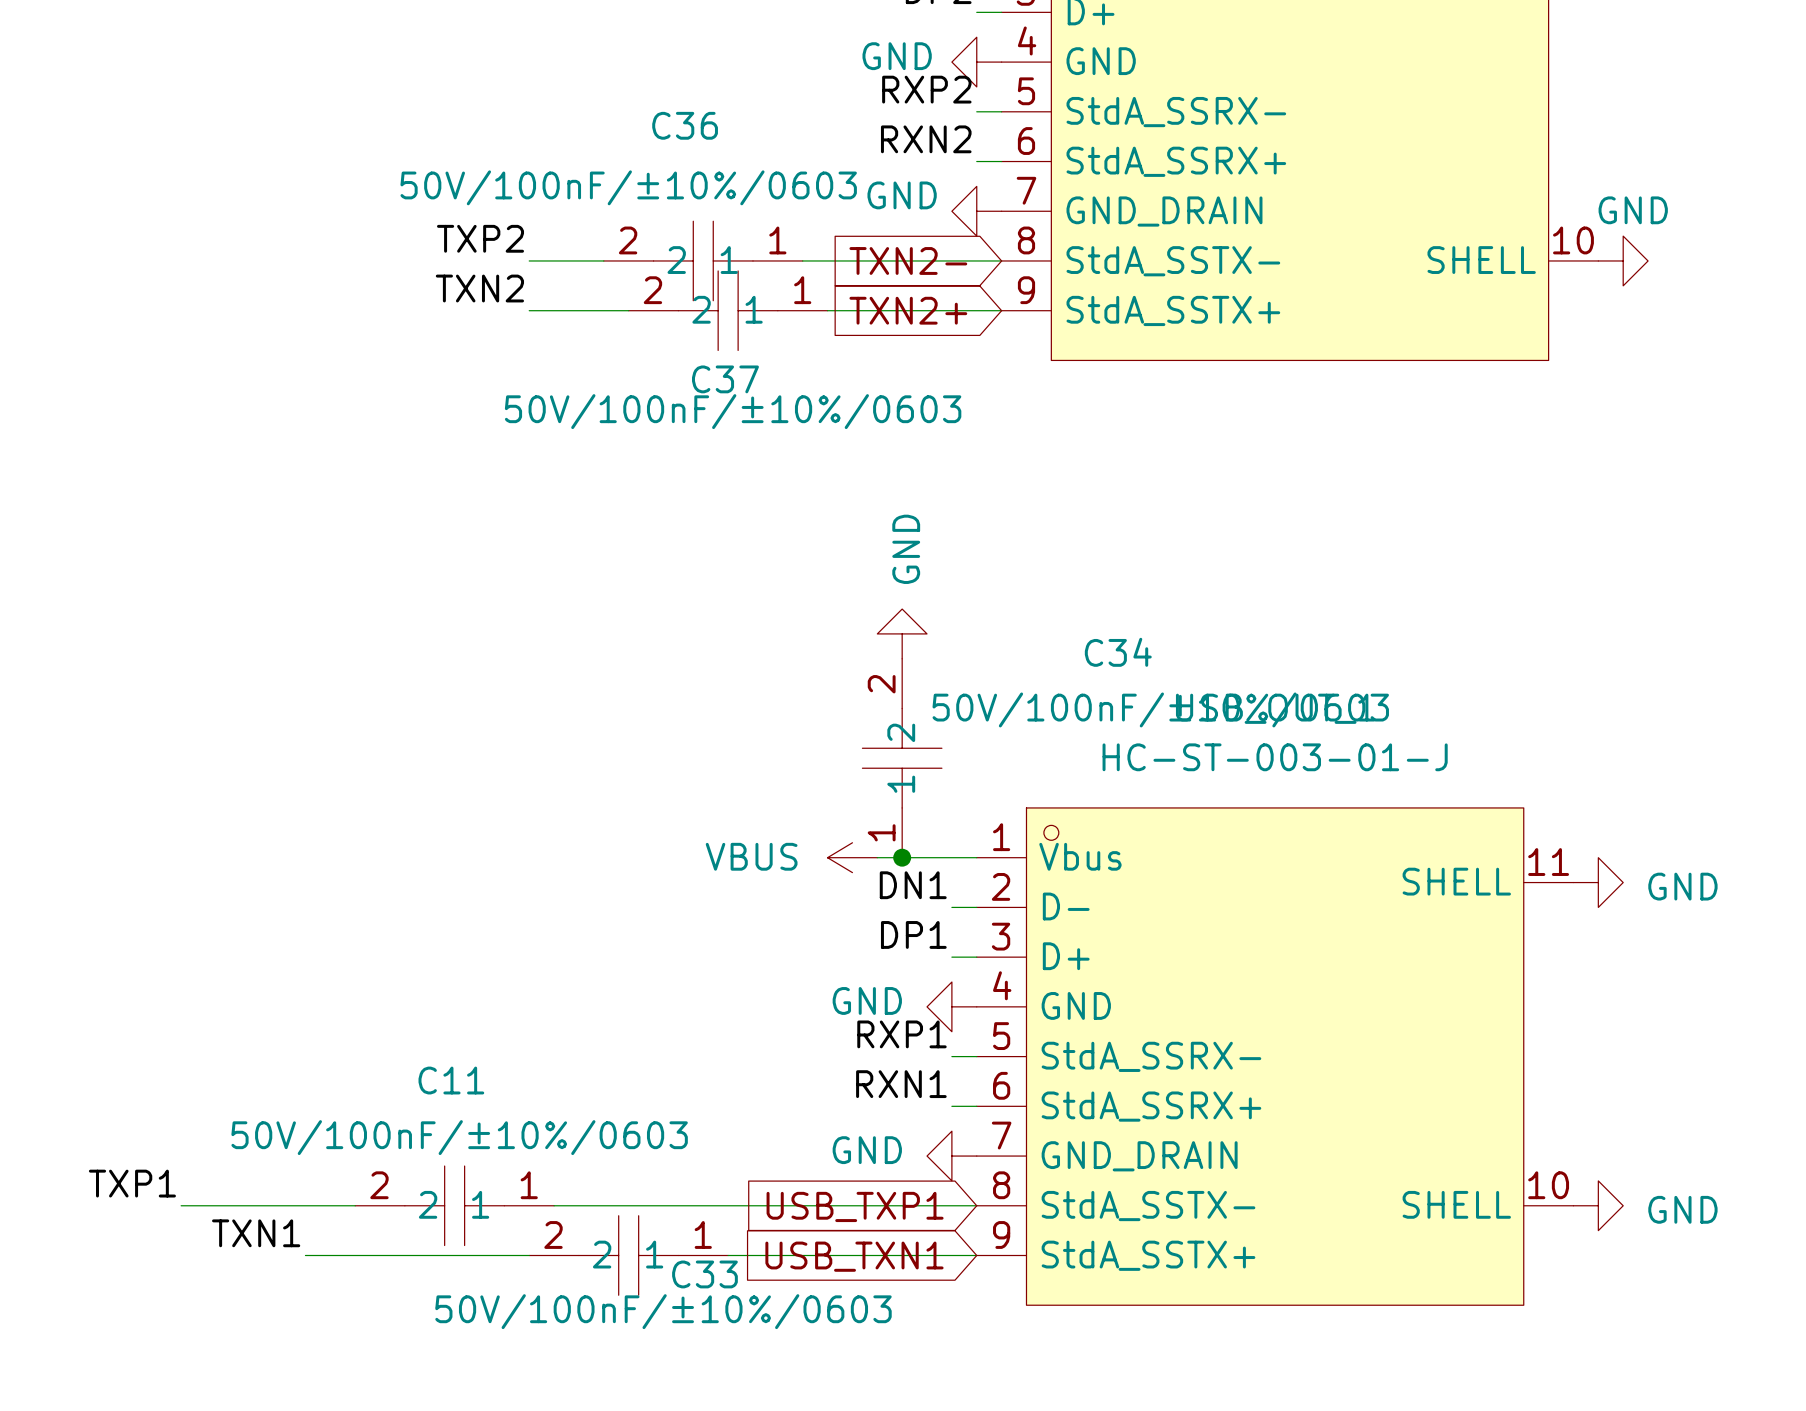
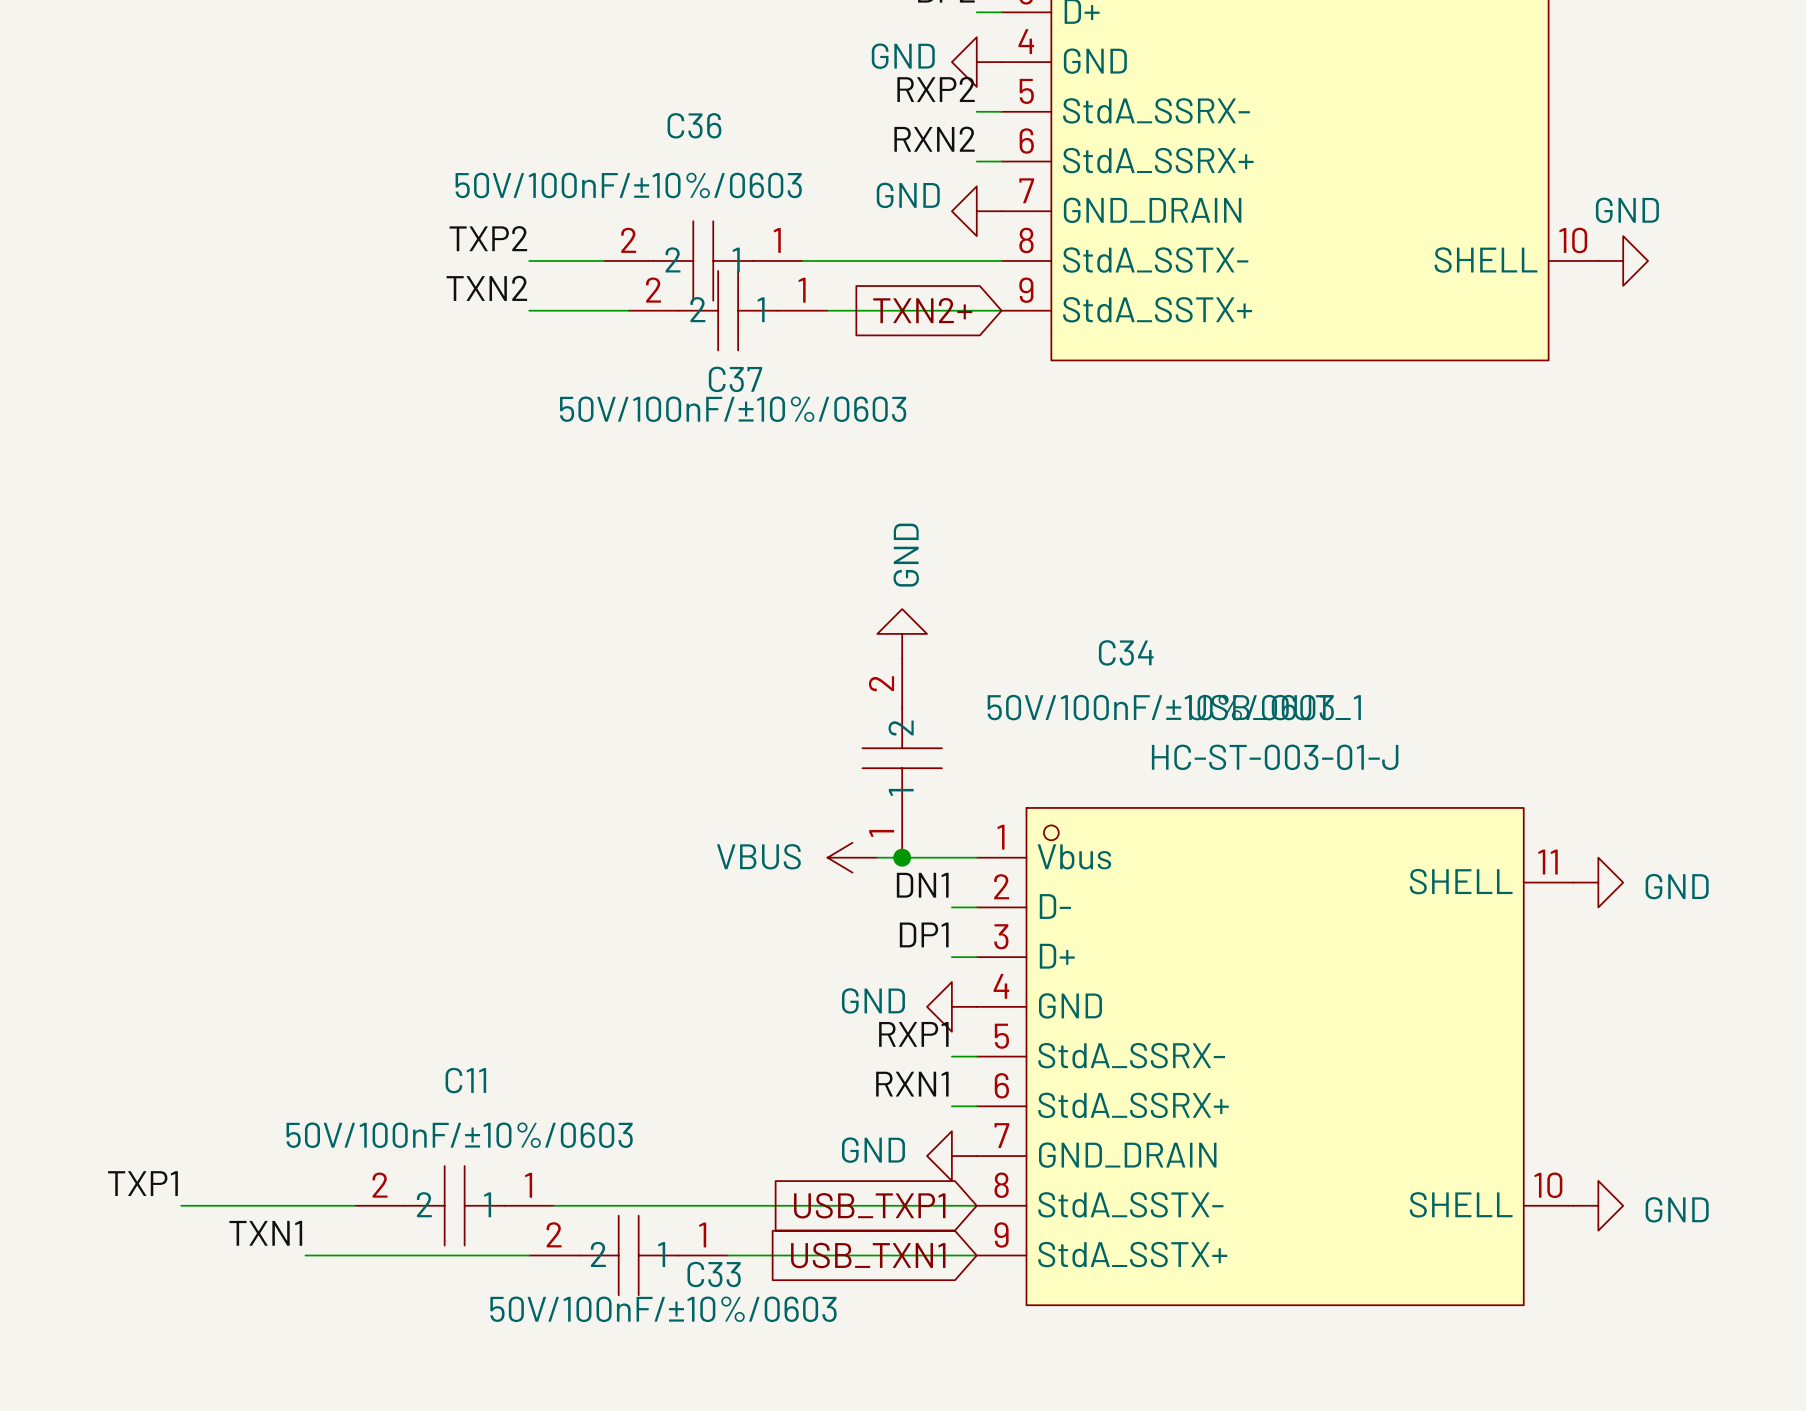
global label: TXN2- (908, 260) -> none

